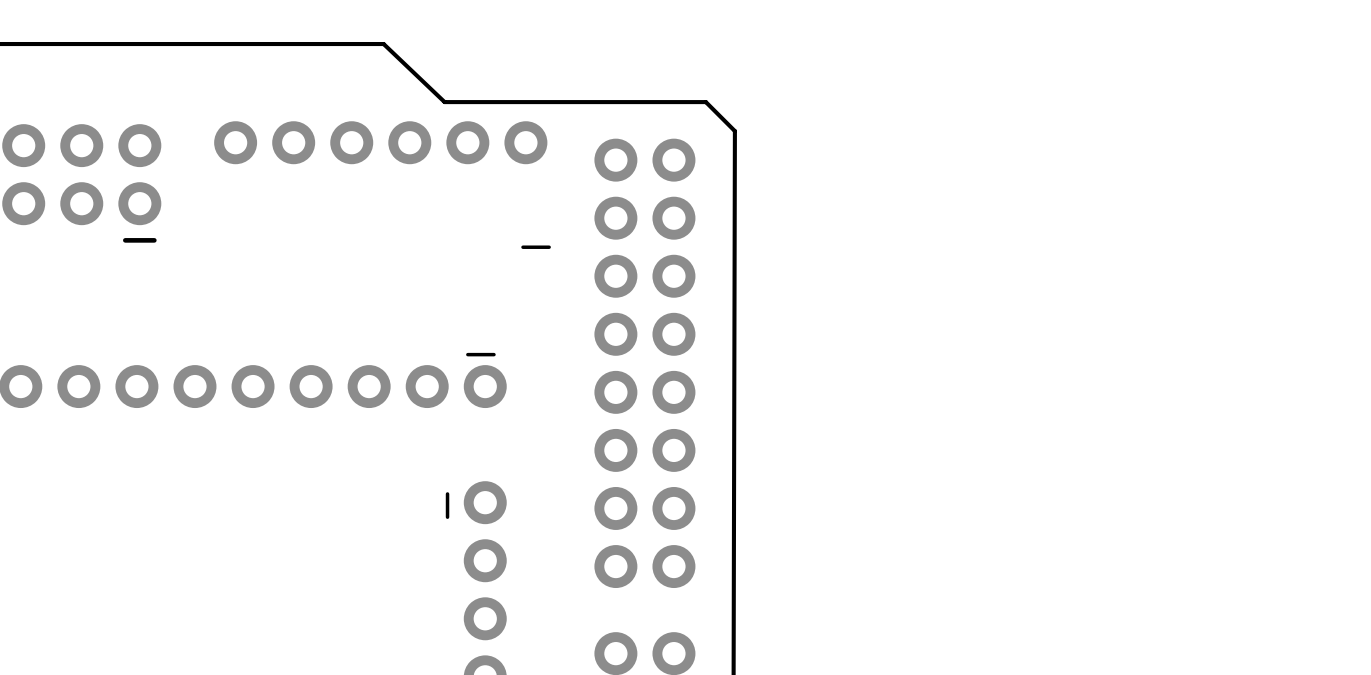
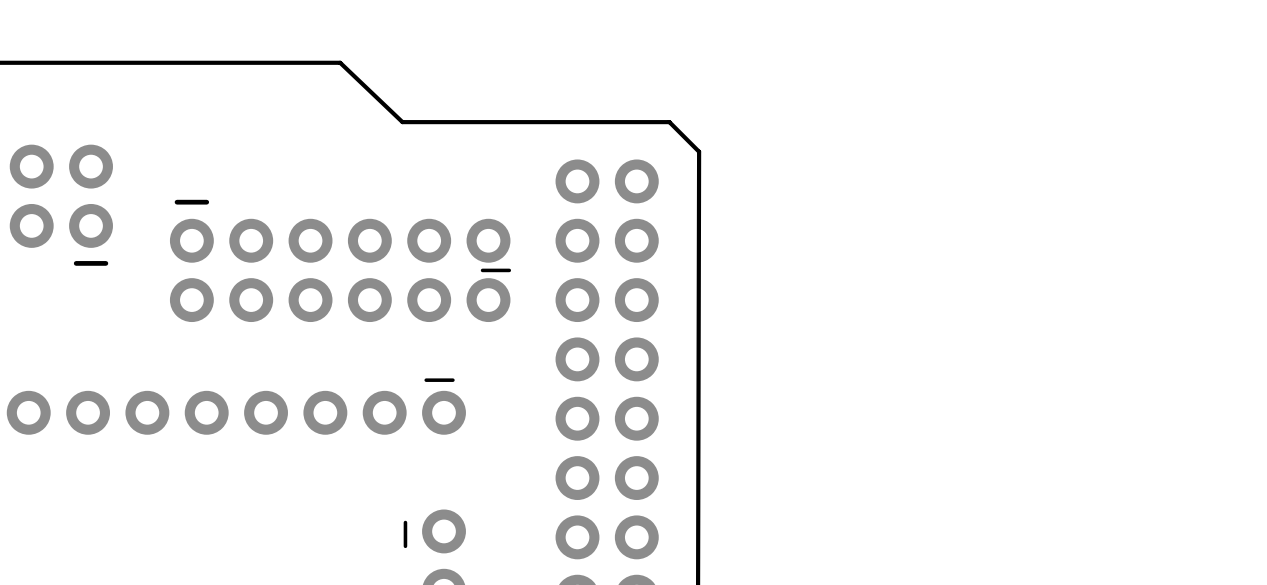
part: (380, 142) -> none
part: none -> (340, 260)

